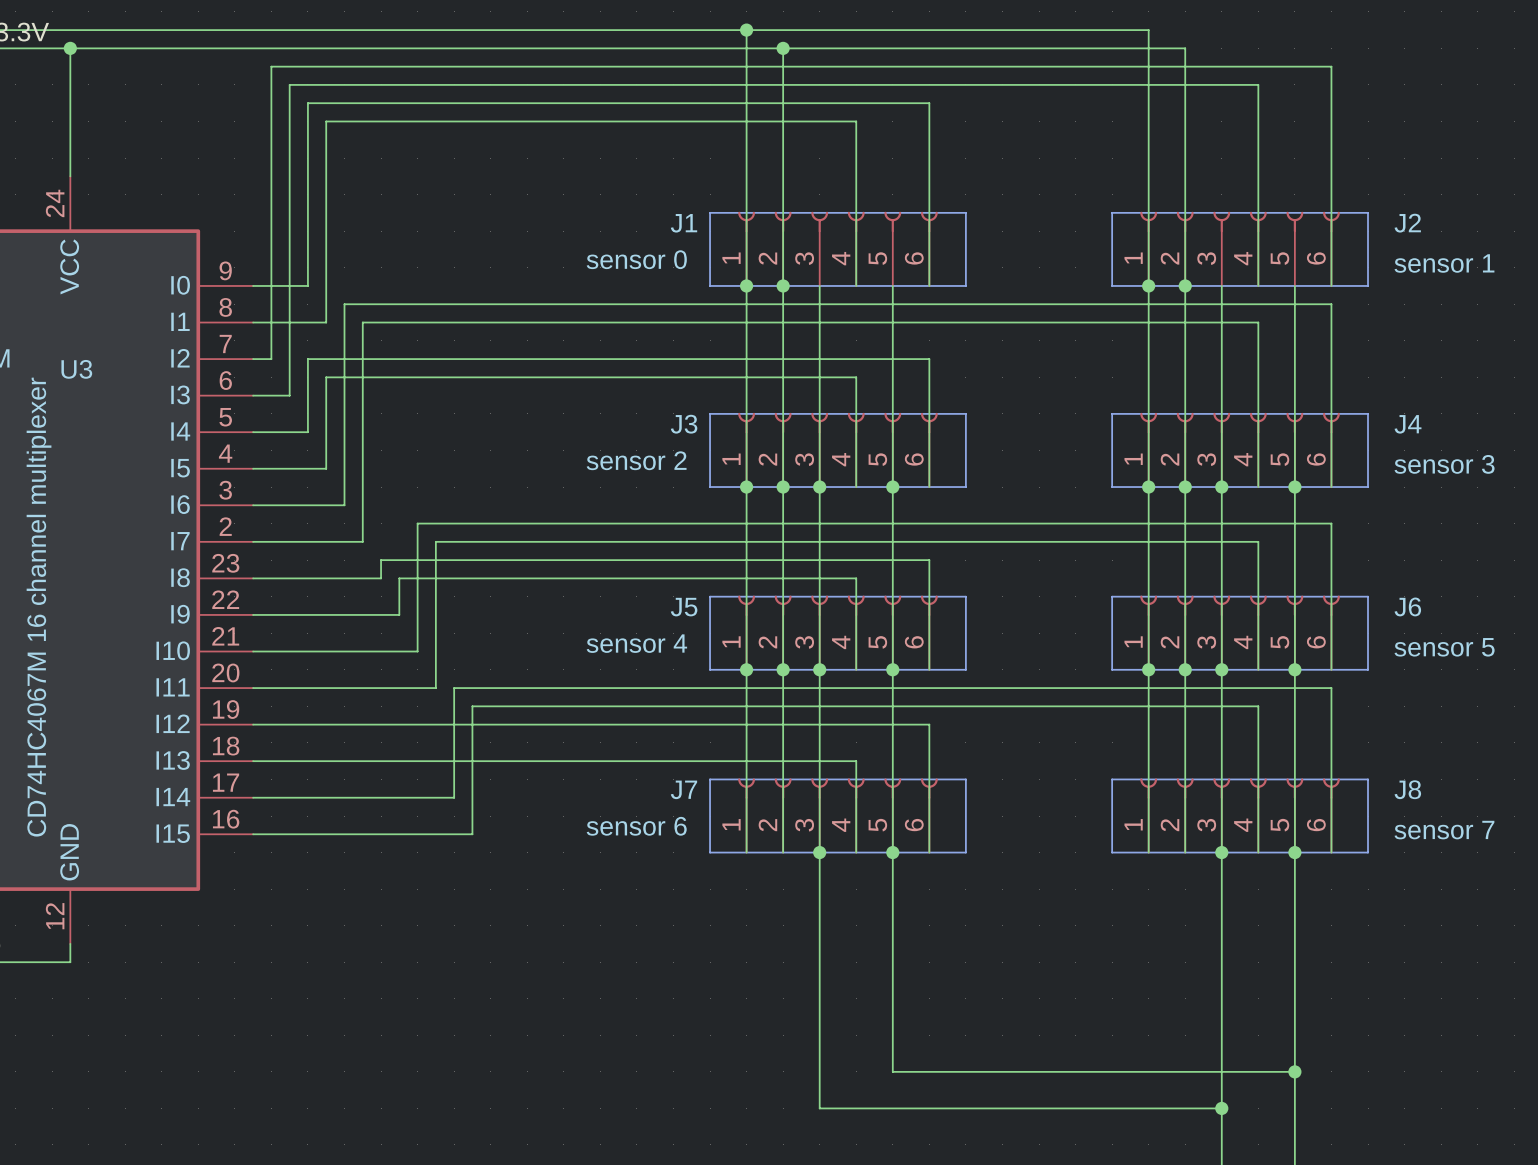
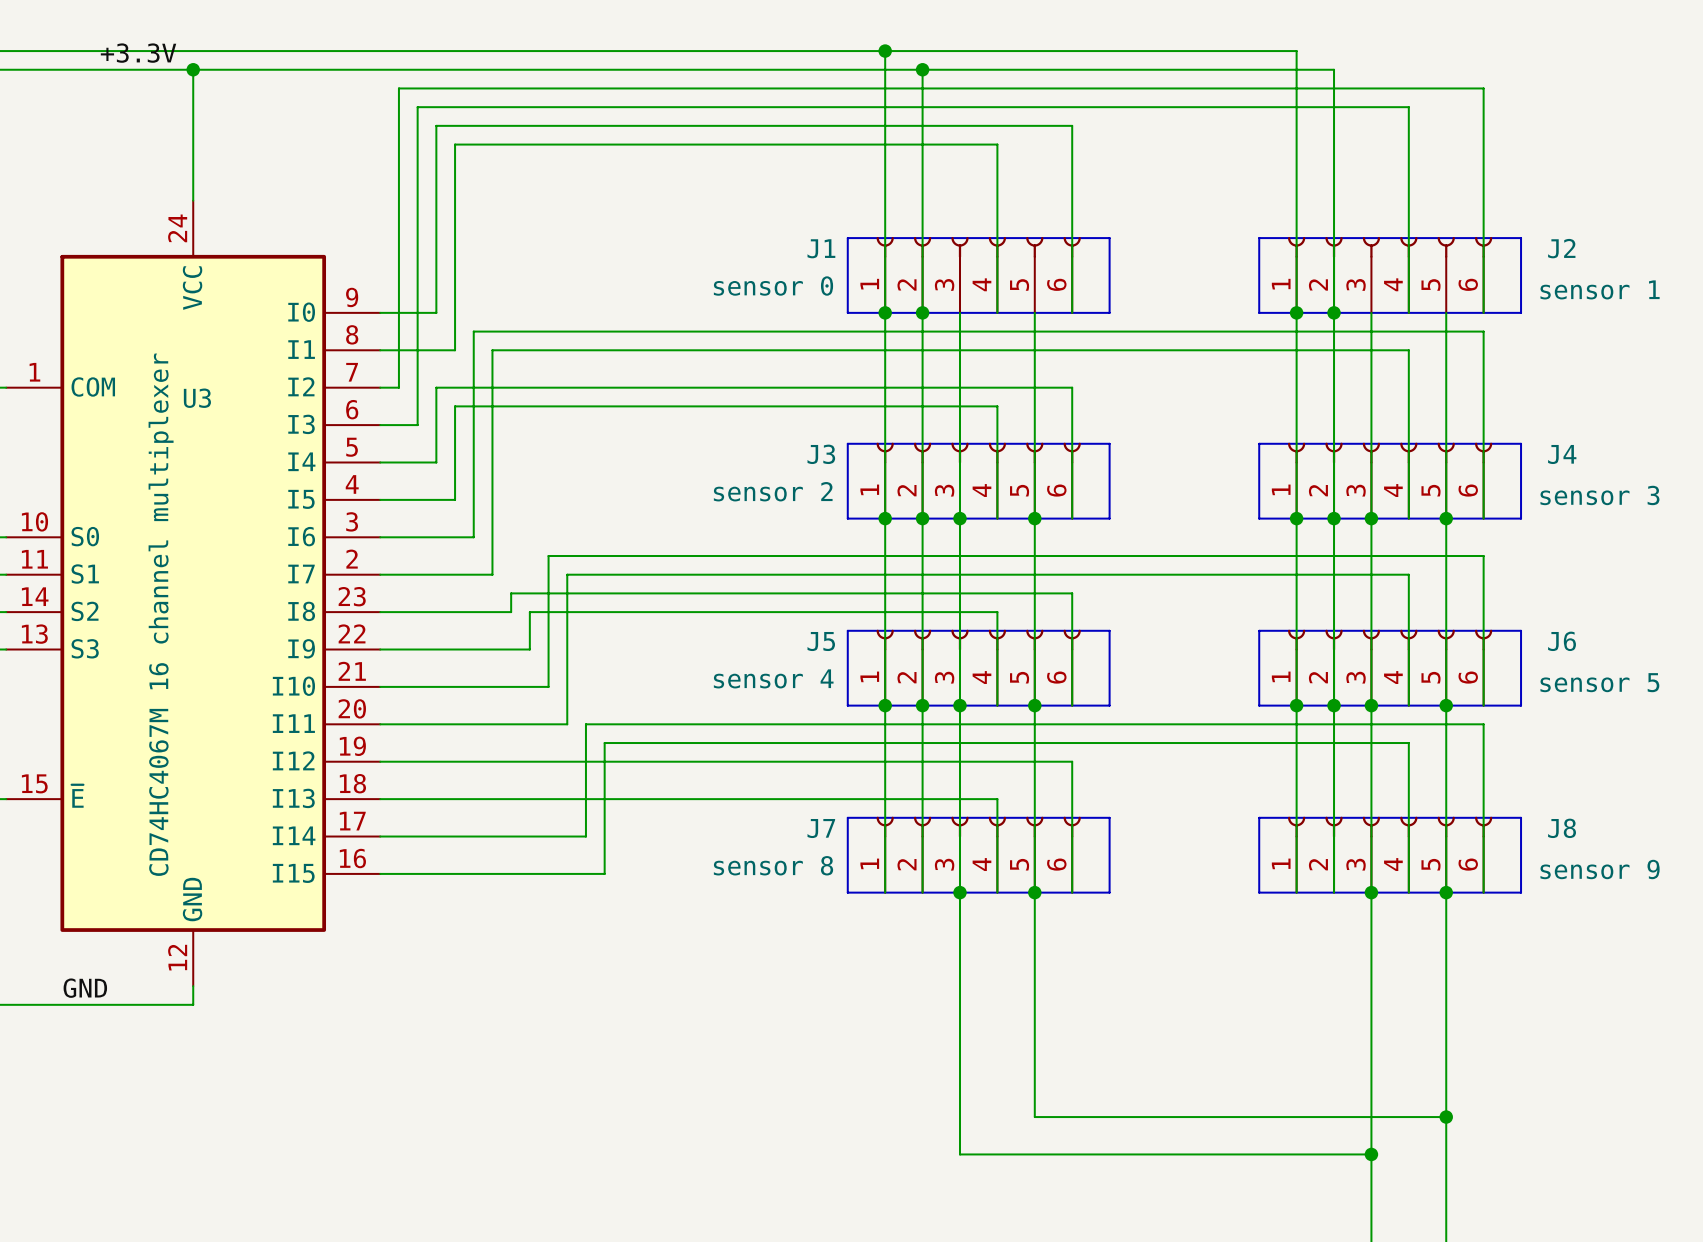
J7 value: sensor 6 (636, 826) -> sensor 8 (773, 865)
J8 value: sensor 7 (1444, 830) -> sensor 9 (1600, 869)

